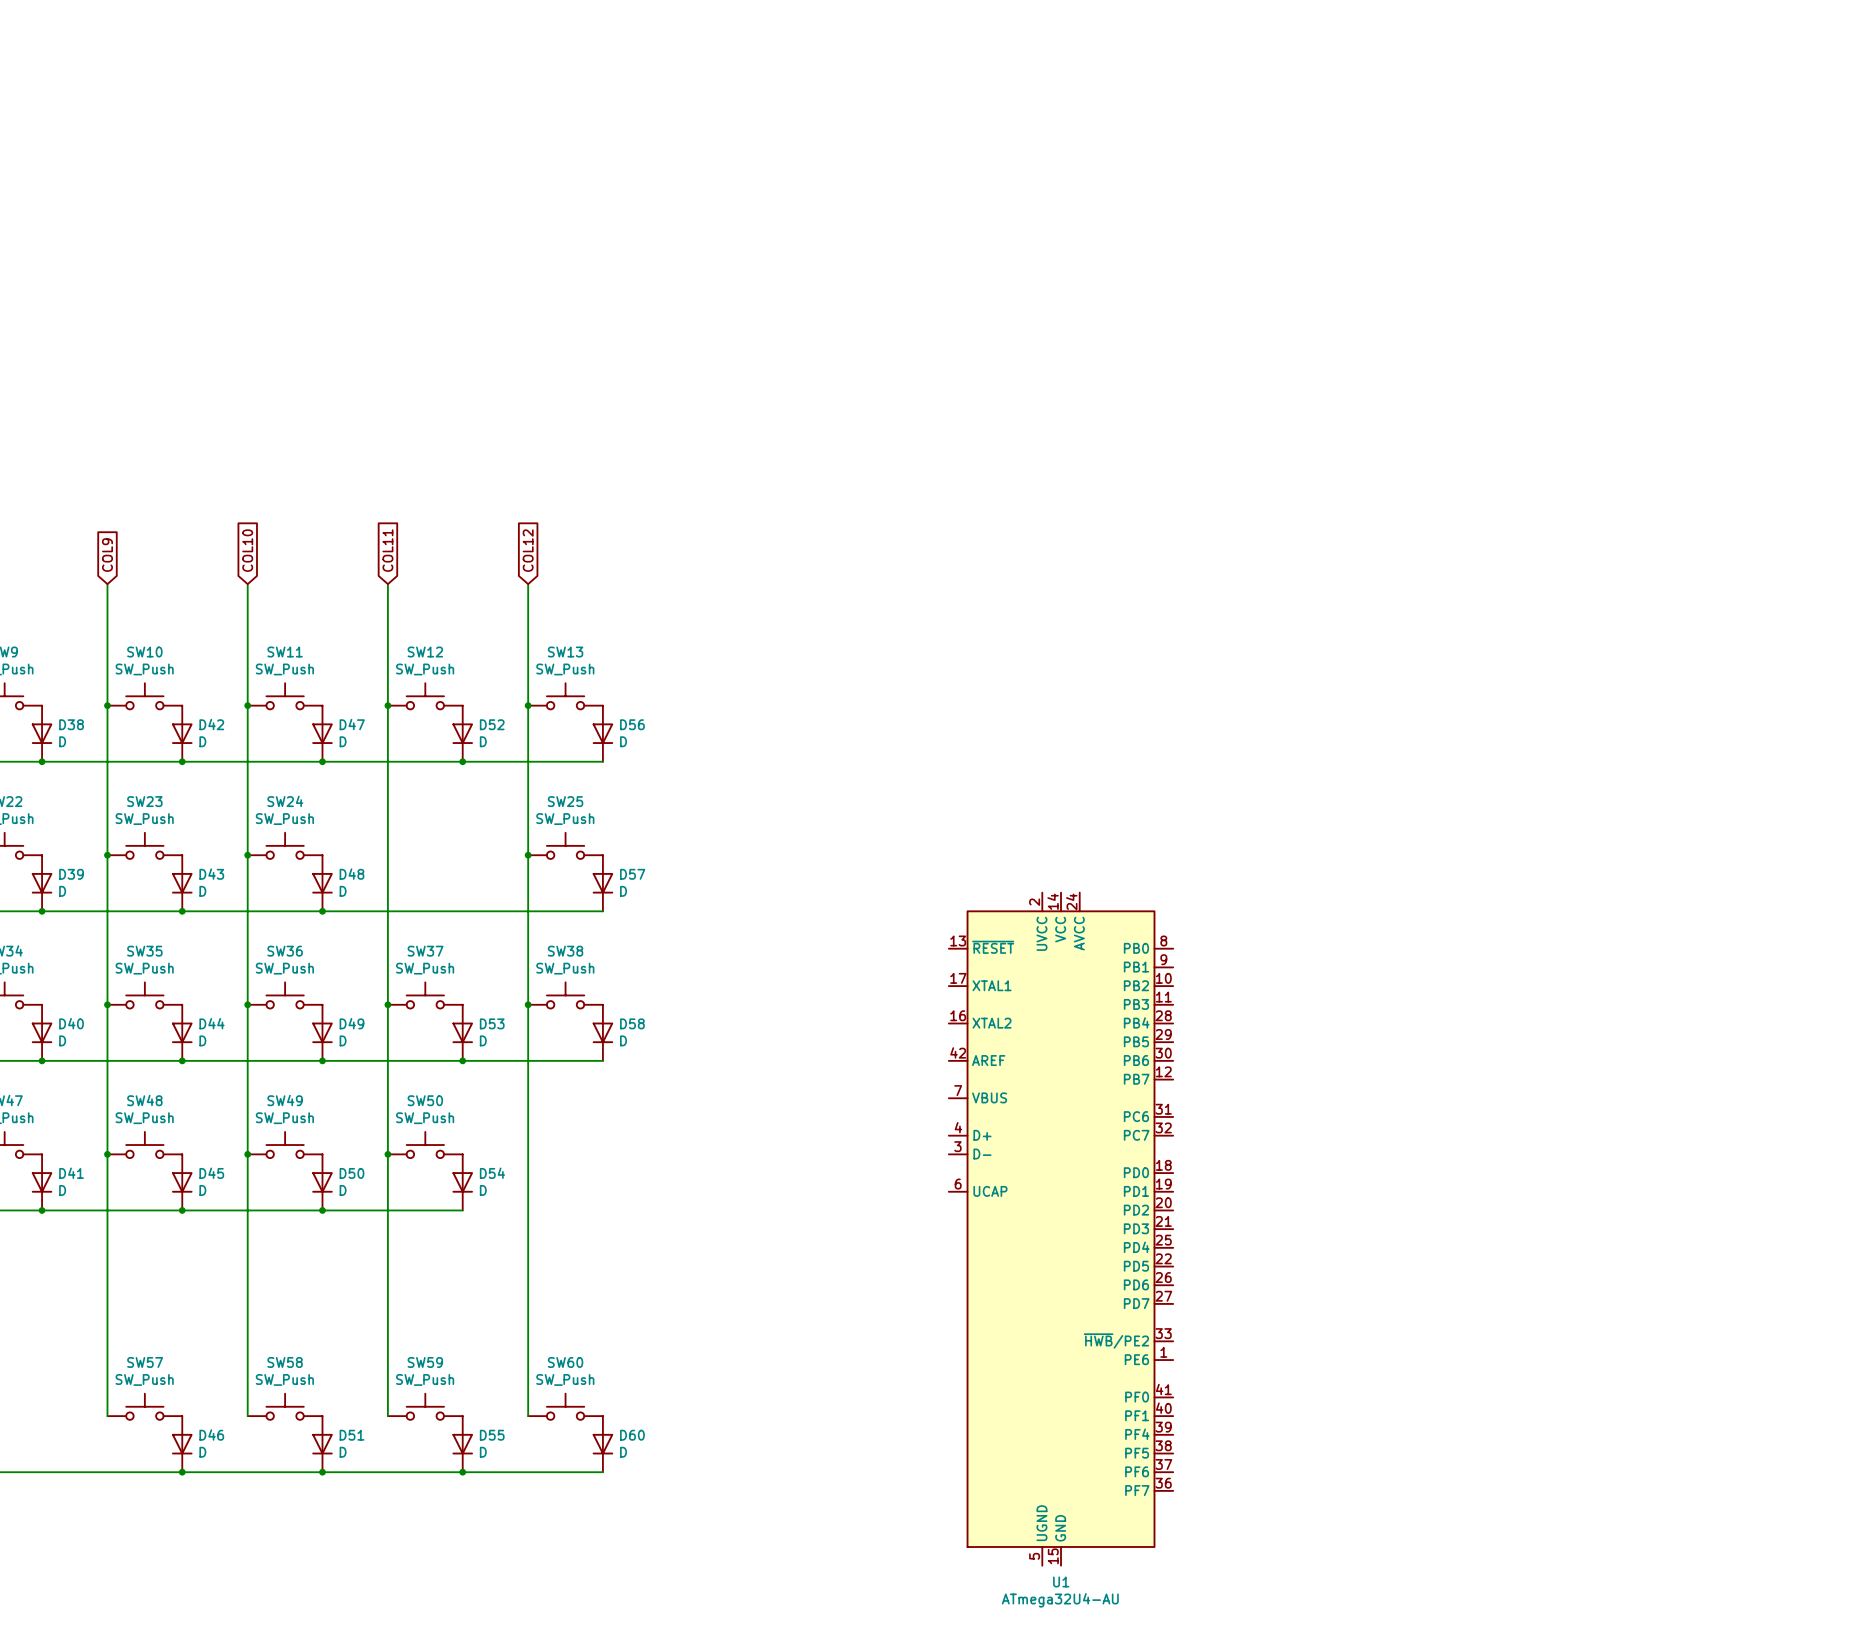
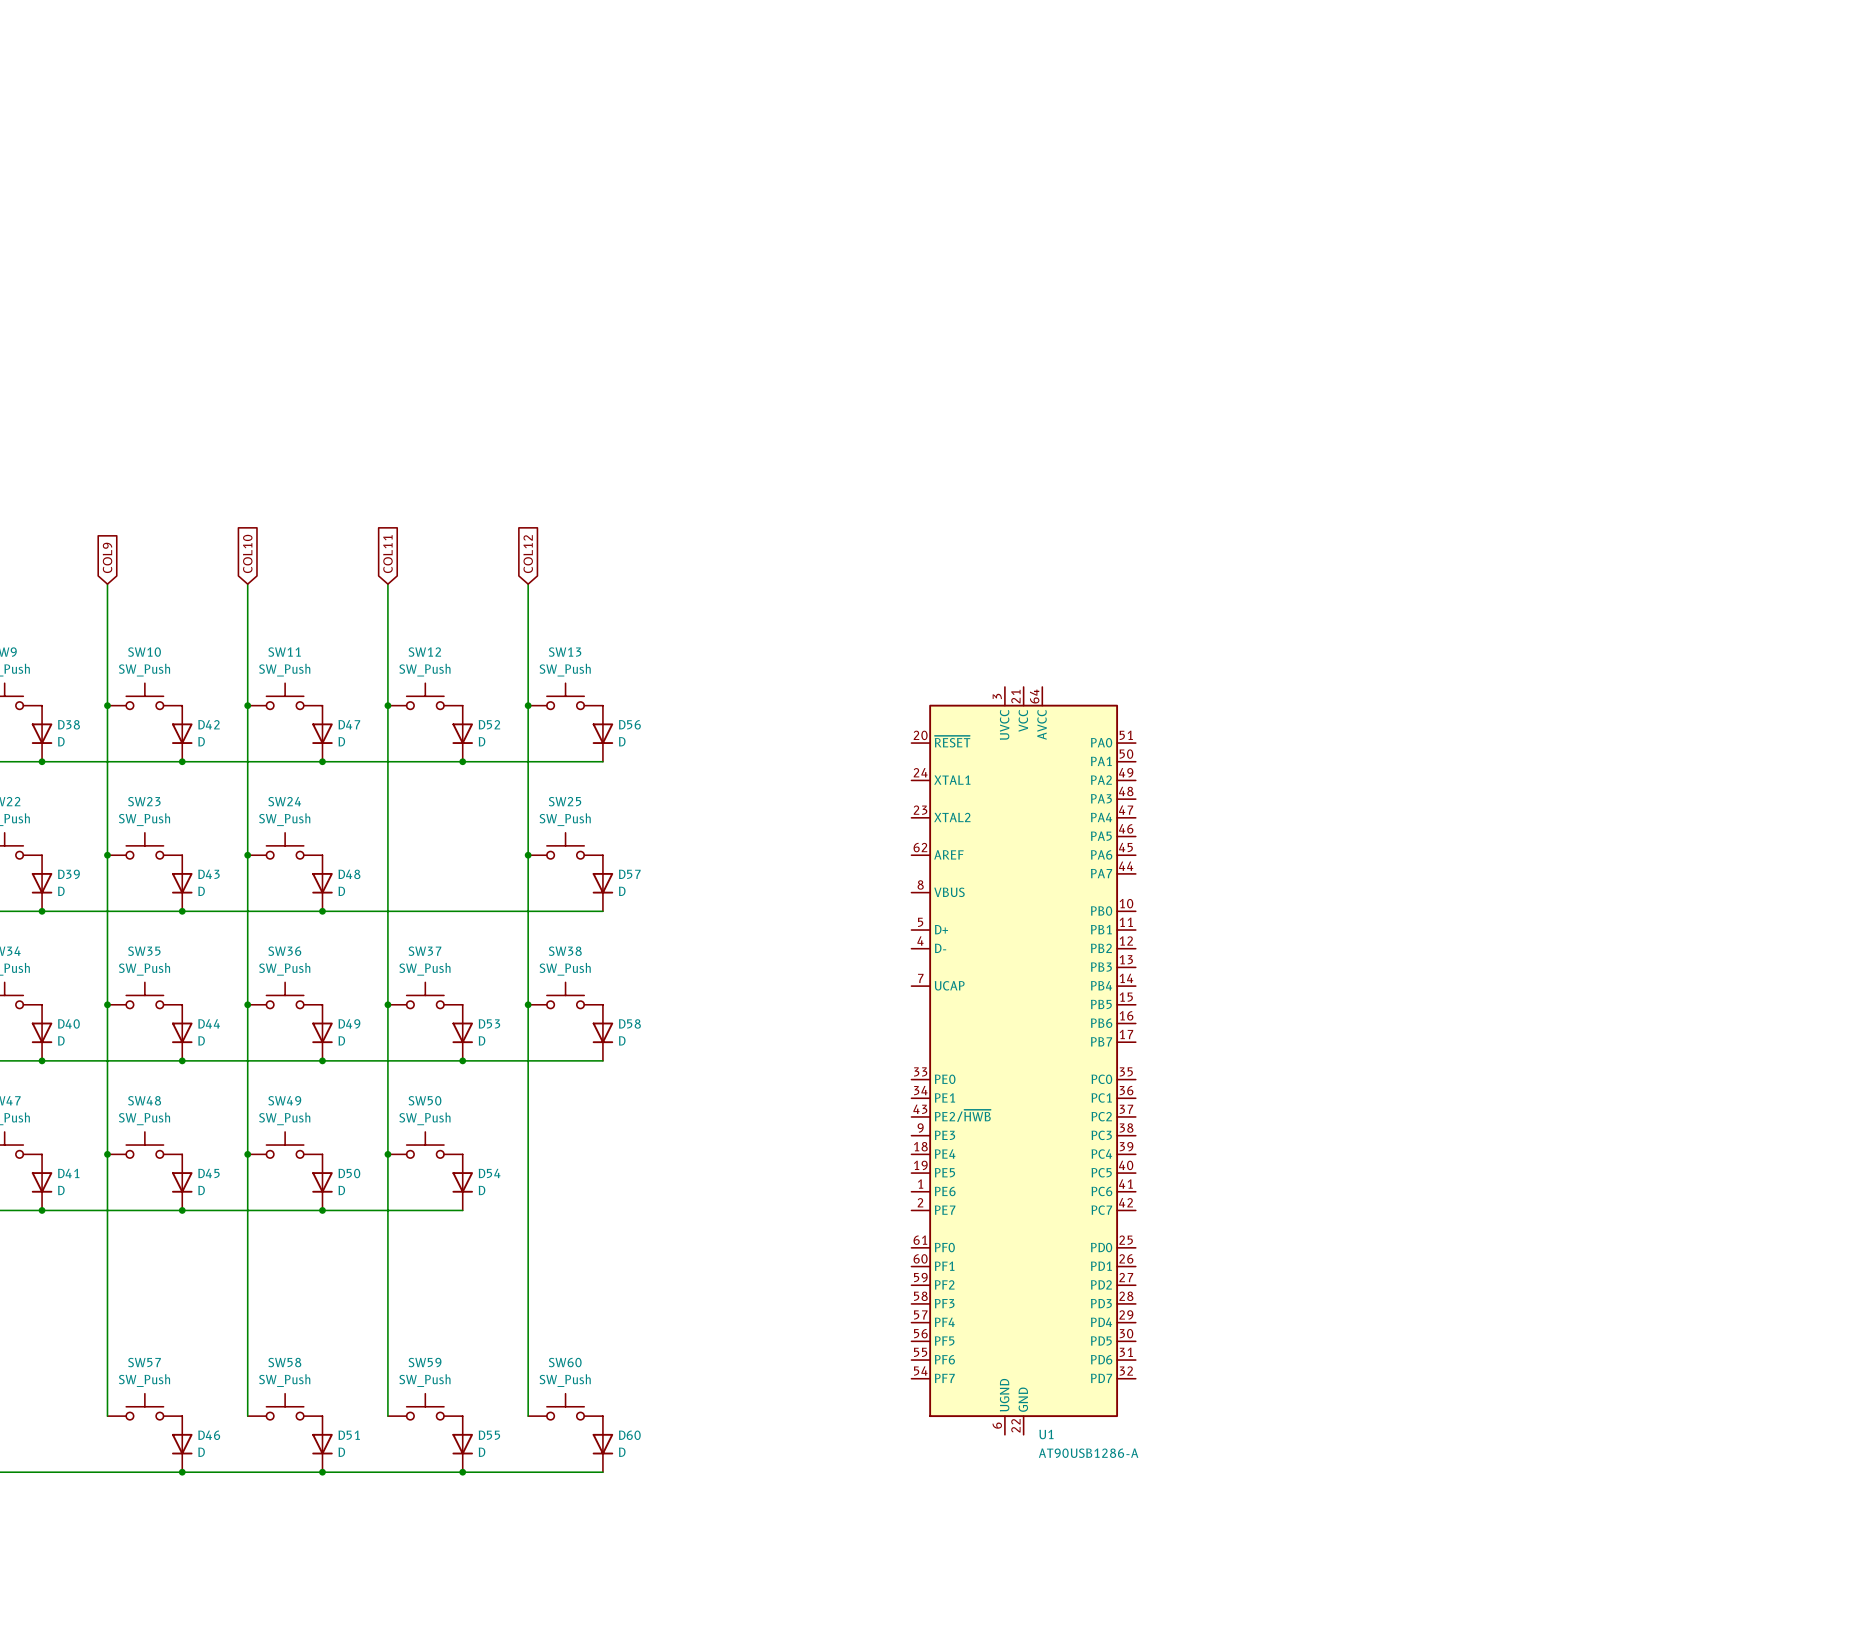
U1 symbol: [948, 892, 1174, 1566] -> [911, 686, 1136, 1435]
U1 name position: U1 (1061, 1581) -> U1 (1046, 1434)
U1 value: ATmega32U4-AU (1060, 1600) -> AT90USB1286-A (1088, 1453)

